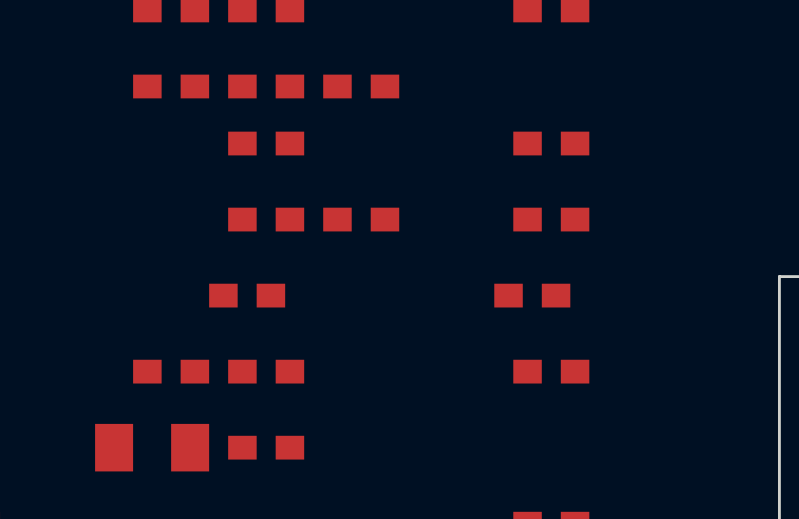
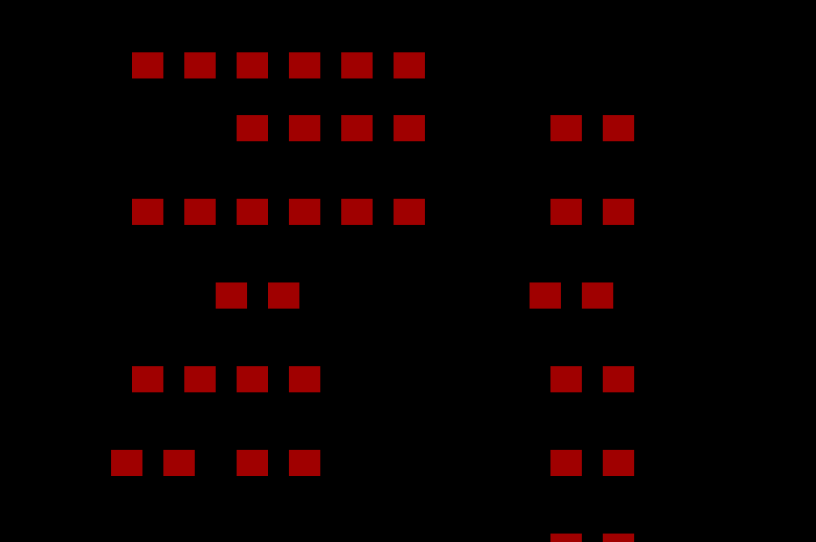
part: none -> (383, 128)
part: none -> (173, 211)
part footprint: [95, 423, 210, 472] -> [111, 449, 195, 477]
part: none -> (592, 462)

